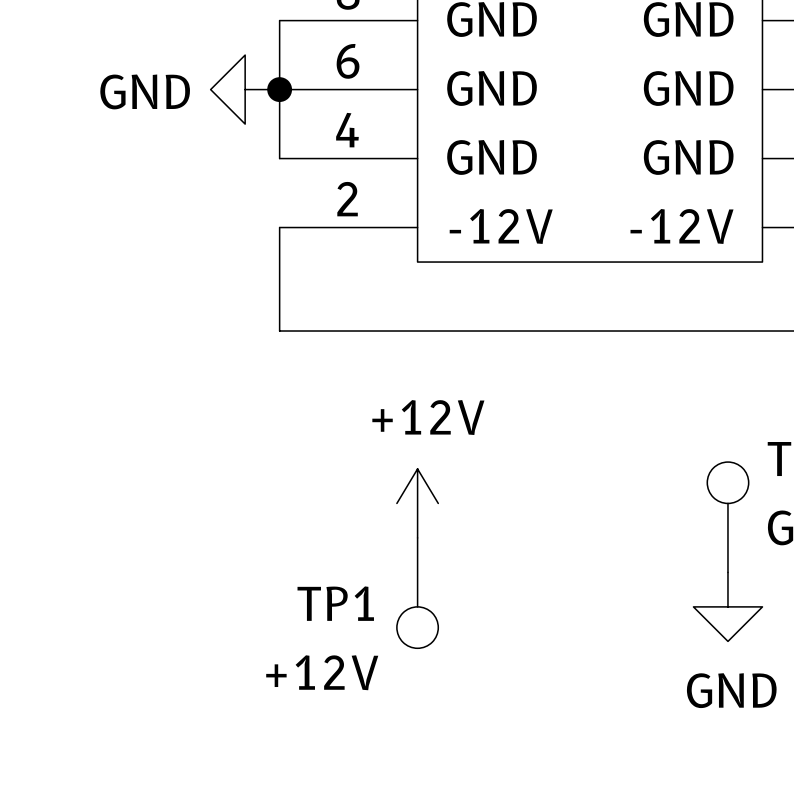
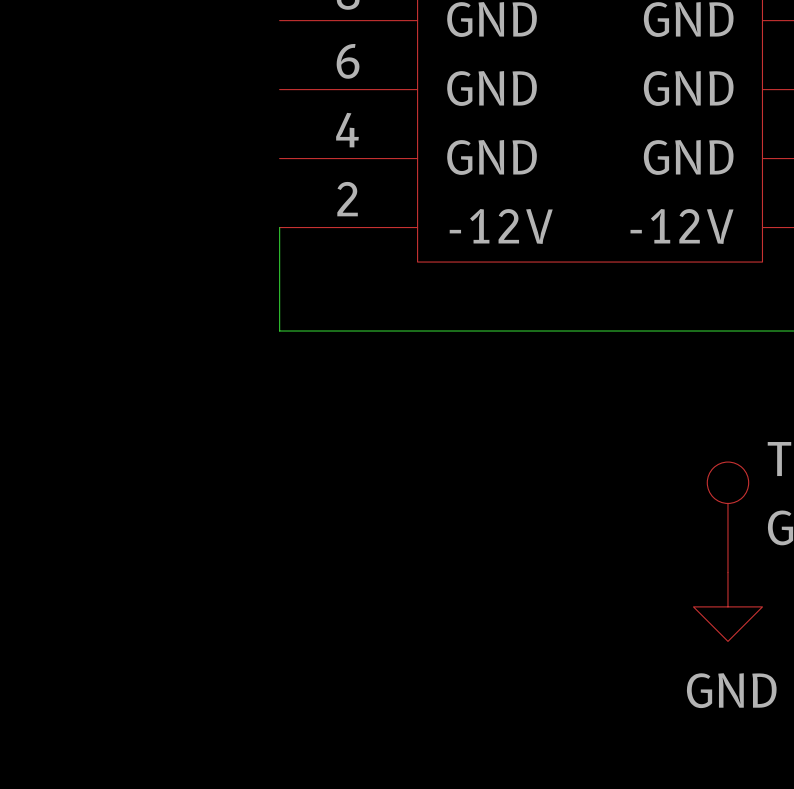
wire: (279, 20) (279, 158) -> none
power symbol: GND (245, 89) -> none
junction: (279, 89) -> none
power symbol: +12V (417, 503) -> none
TP1: +12V (417, 593) -> none

